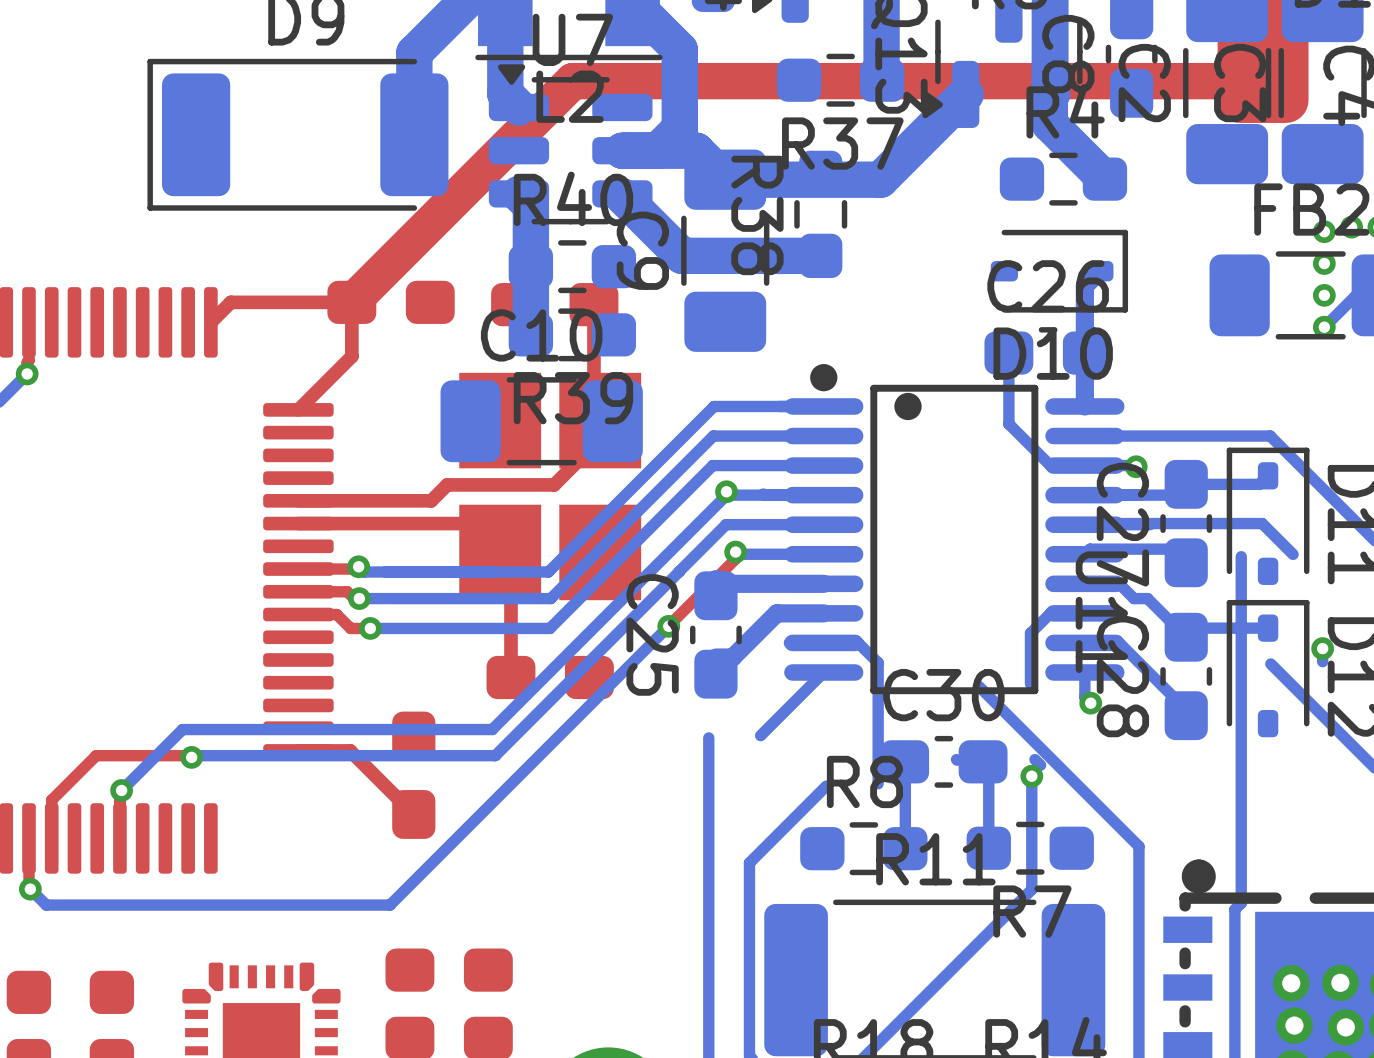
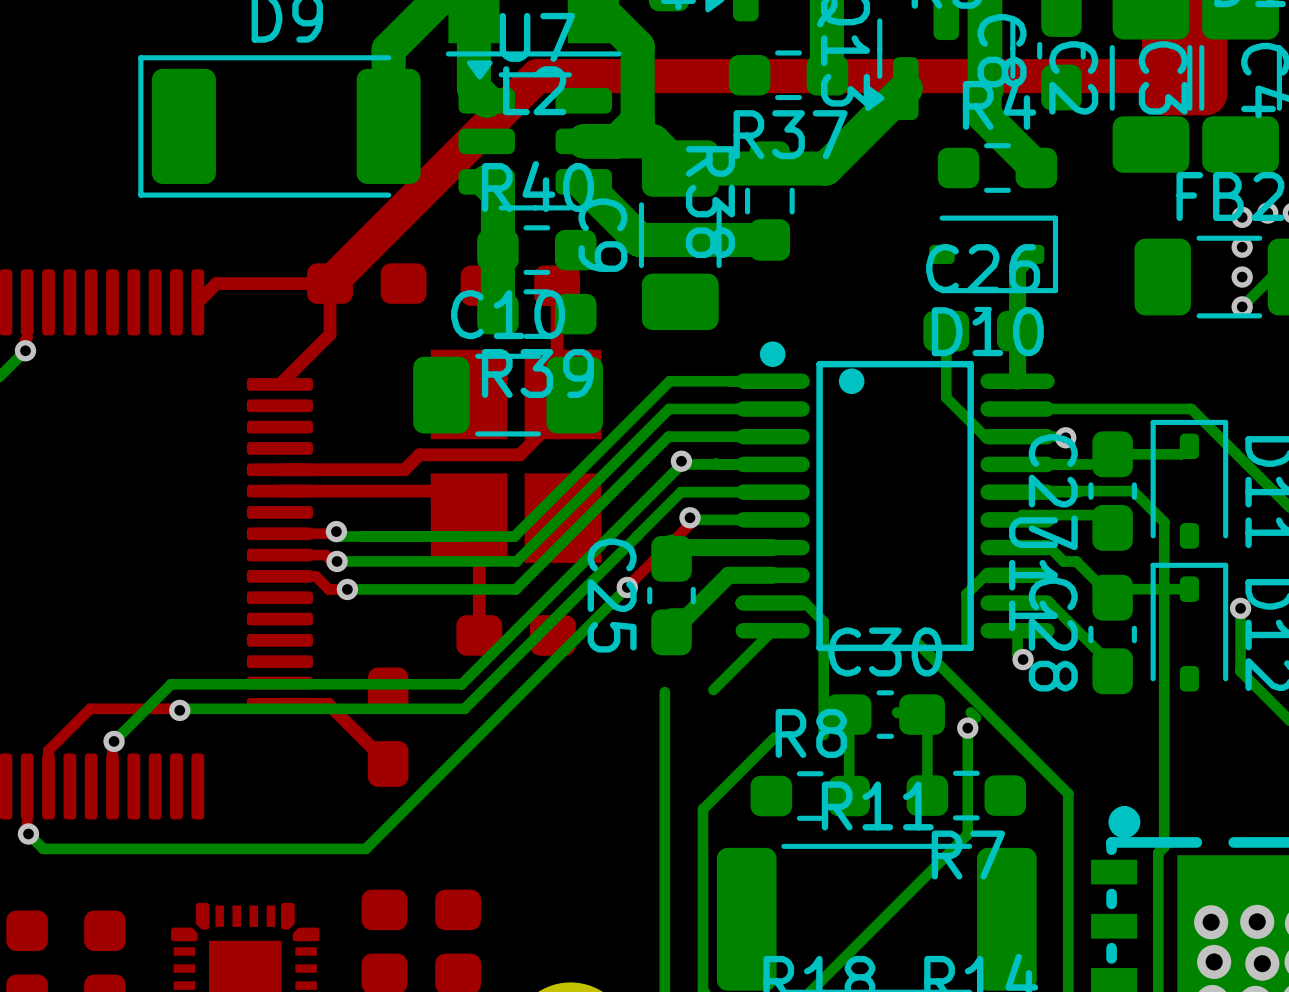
bottom track: (1208, 523) (1262, 523) (1293, 554) -> (1133, 491) (1164, 522)
bottom track: (1270, 663) (1322, 715) -> (1240, 620) (1240, 671)

